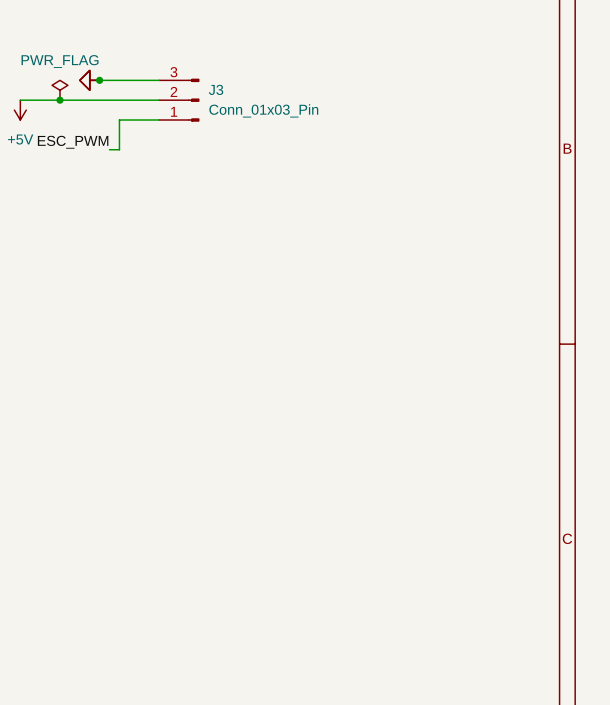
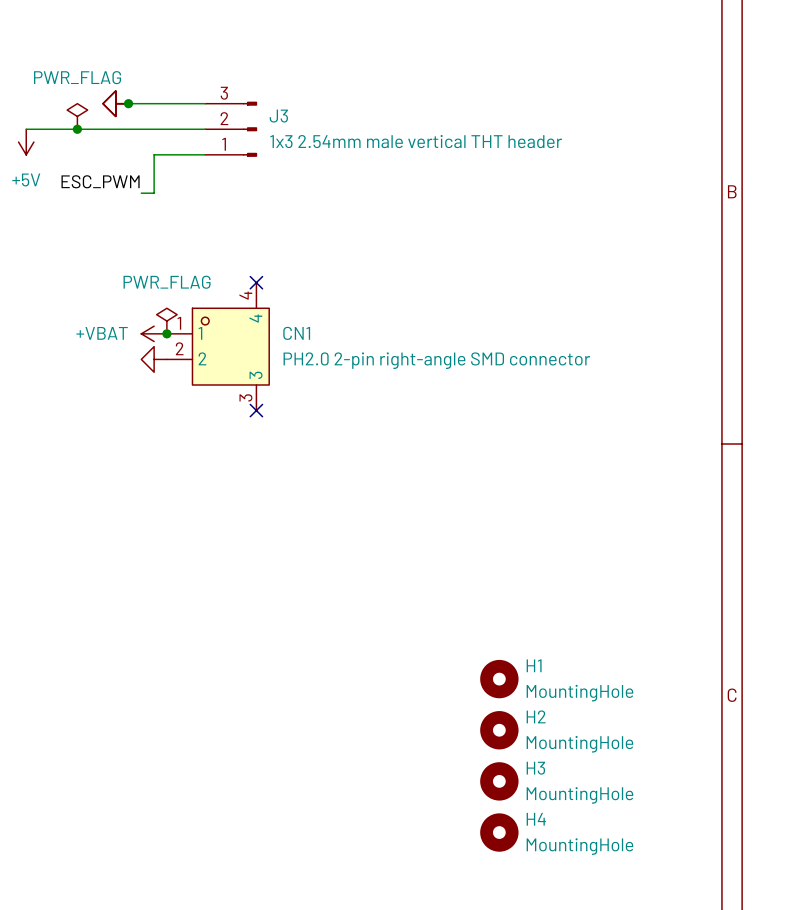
J3 value: Conn_01x03_Pin (263, 110) -> 1x3 2.54mm male vertical THT header (416, 141)
no-connect mark: none -> (256, 282)
power symbol: none -> PWR_FLAG (166, 321)
power symbol: none -> +VBAT (154, 333)
junction: none -> (166, 333)
CN1: none -> PH2.0 2-pin right-angle SMD connector (218, 346)
power symbol: none -> (154, 359)
no-connect mark: none -> (256, 410)
H1: none -> MountingHole (499, 679)
H2: none -> MountingHole (499, 730)
H3: none -> MountingHole (499, 781)
H4: none -> MountingHole (499, 832)

